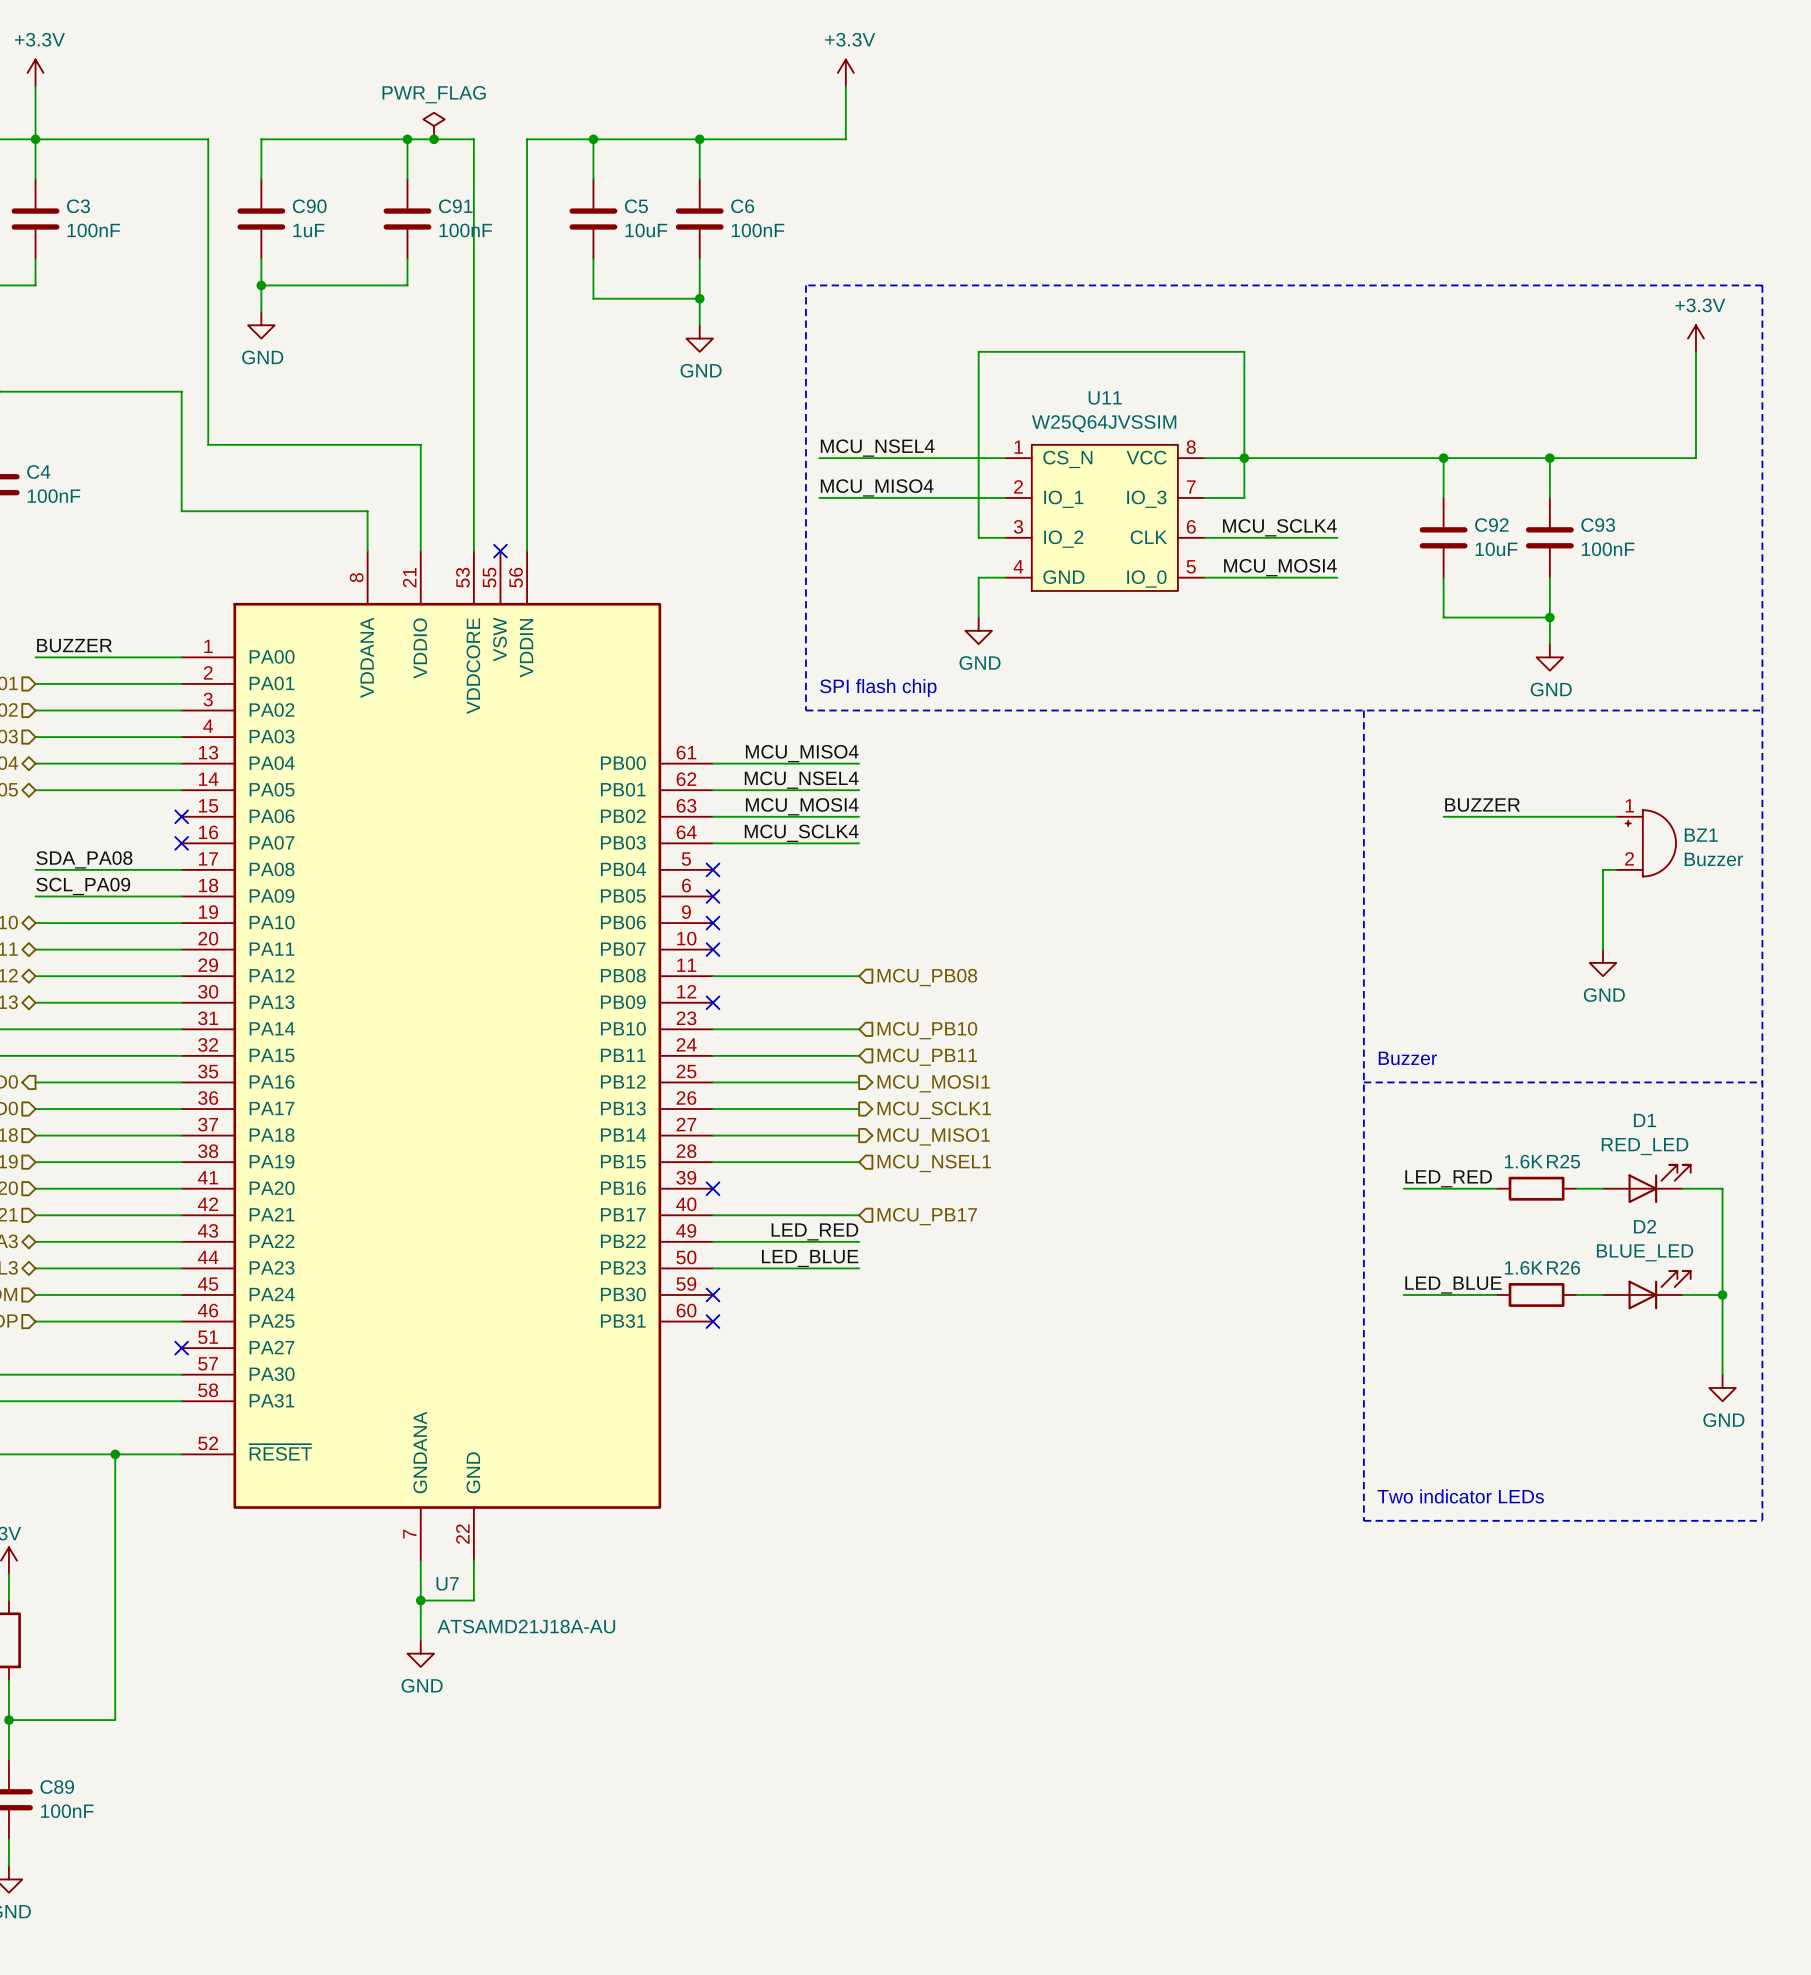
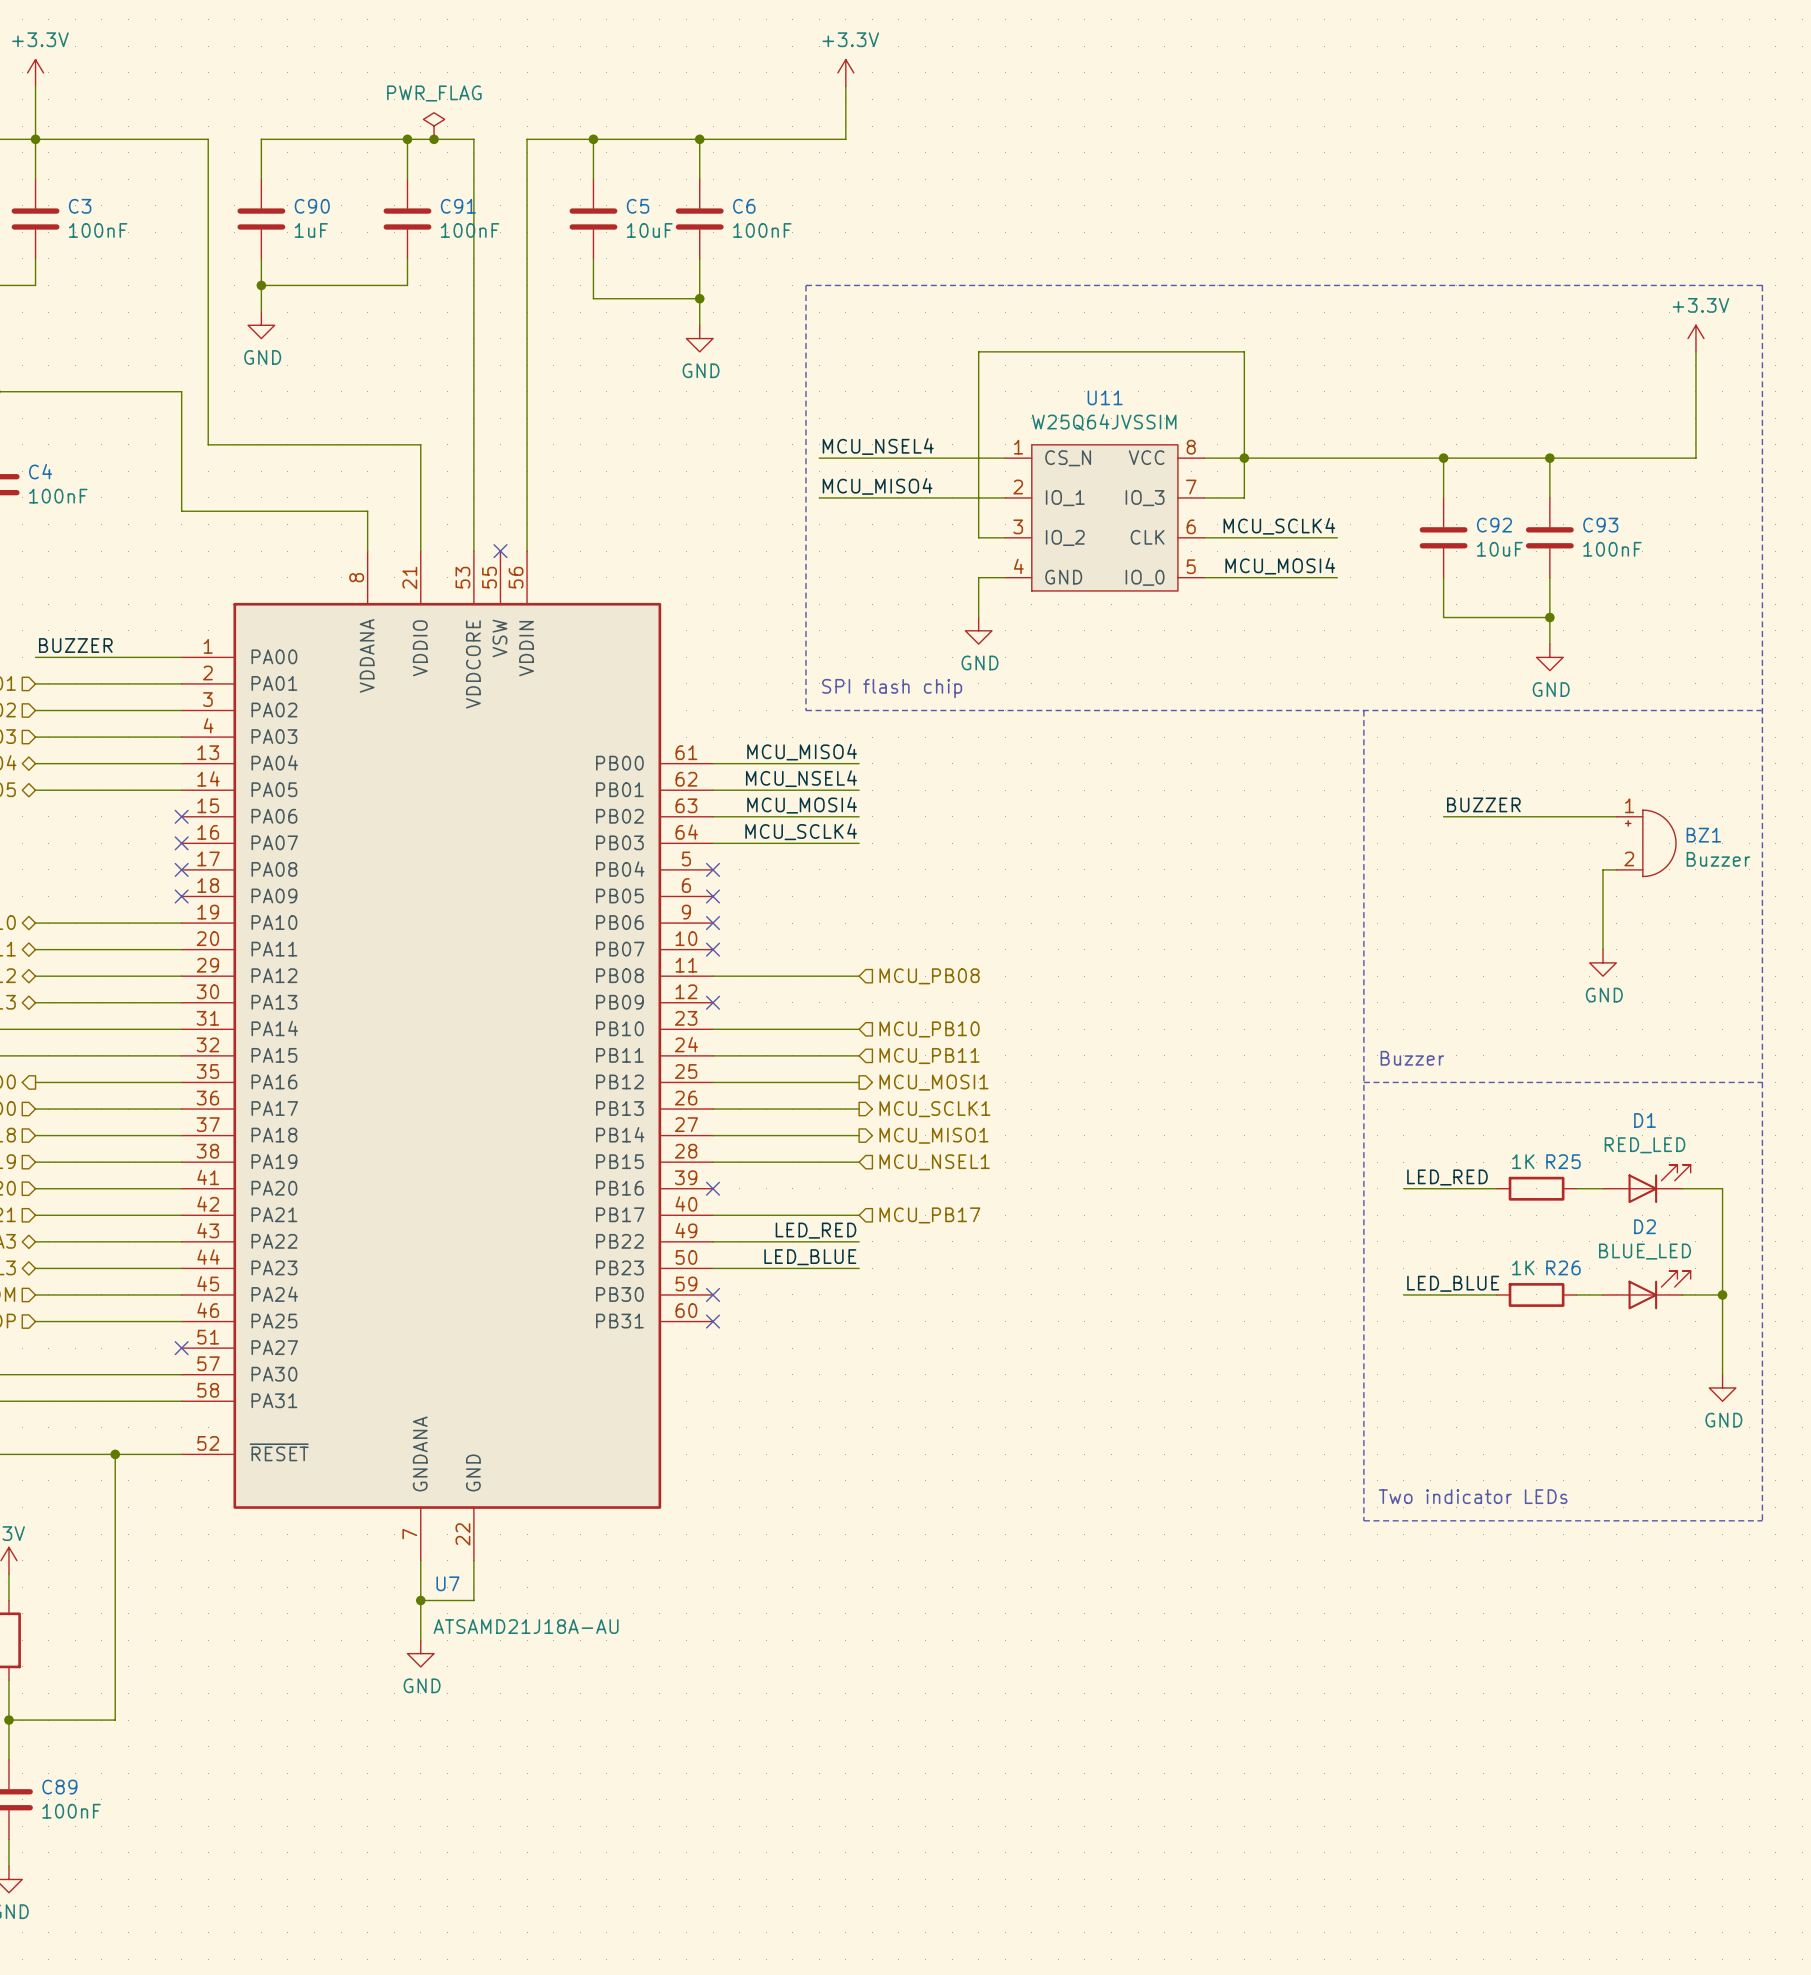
label: SDA_PA08 (84, 859) -> none
wire: (35, 869) (181, 869) -> none
no-connect mark: none -> (181, 869)
label: SCL_PA09 (83, 886) -> none
wire: (35, 896) (181, 896) -> none
no-connect mark: none -> (181, 896)
R25 value: 1.6K (1523, 1161) -> 1K (1523, 1161)
R26 value: 1.6K (1523, 1267) -> 1K (1523, 1267)

